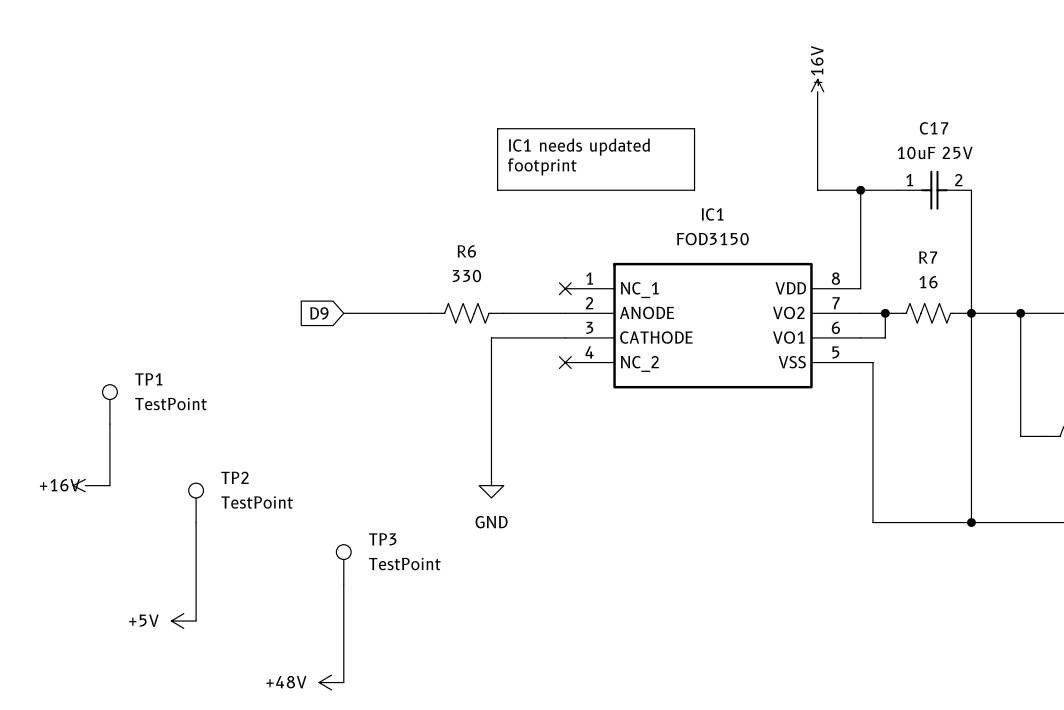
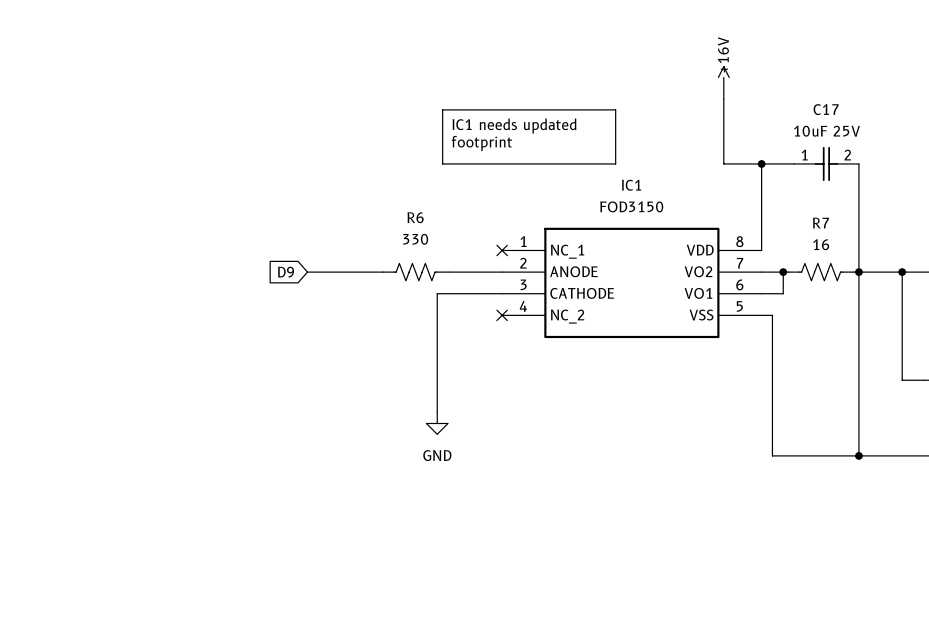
TP1: TestPoint (109, 404) -> none
wire: (109, 424) (109, 485) -> none
power symbol: (91, 485) -> none
TP2: TestPoint (196, 502) -> none
wire: (196, 522) (196, 621) -> none
TP3: TestPoint (343, 564) -> none
wire: (343, 584) (343, 682) -> none
power symbol: +5V (183, 621) -> none
power symbol: +48V (331, 682) -> none

